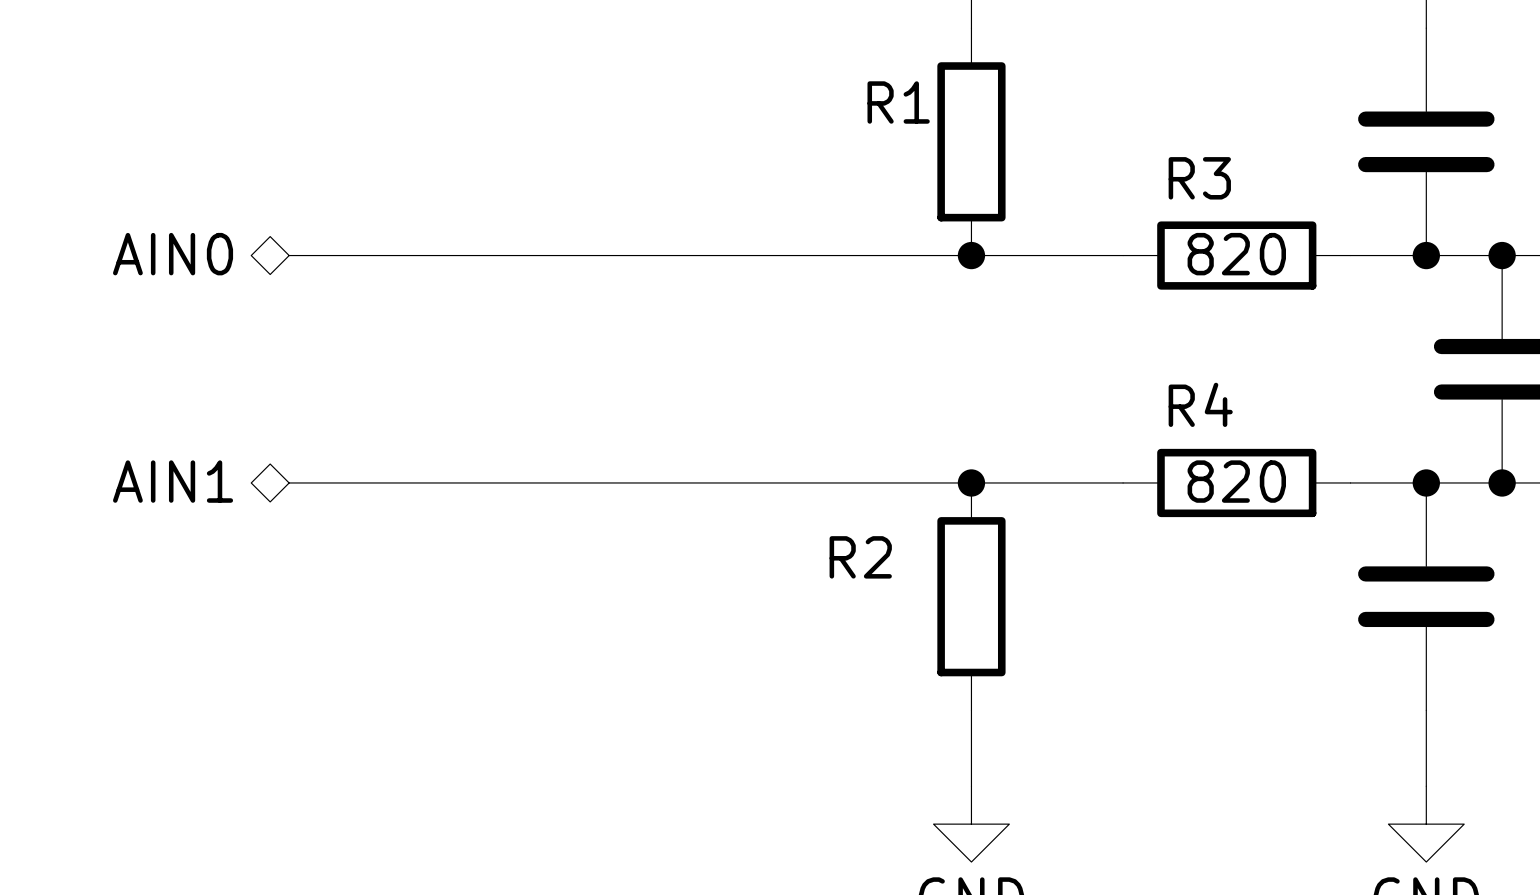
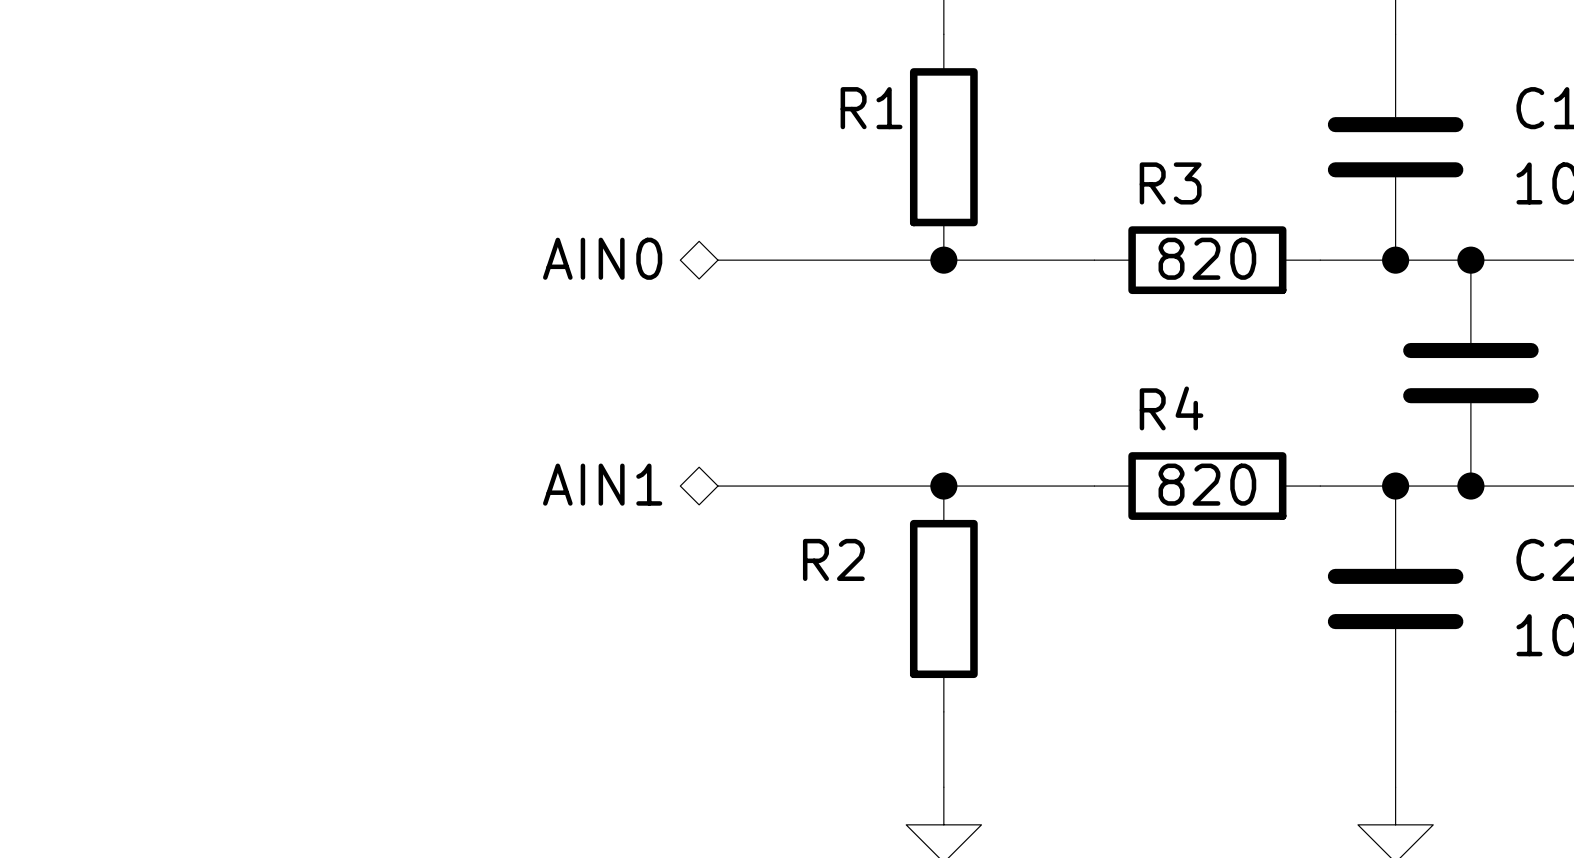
hierarchical label position: AIN0 (173, 254) -> AIN0 (602, 258)
wire: (289, 255) (744, 255) -> none
hierarchical label position: AIN1 (173, 481) -> AIN1 (602, 484)
wire: (289, 482) (744, 482) -> none

